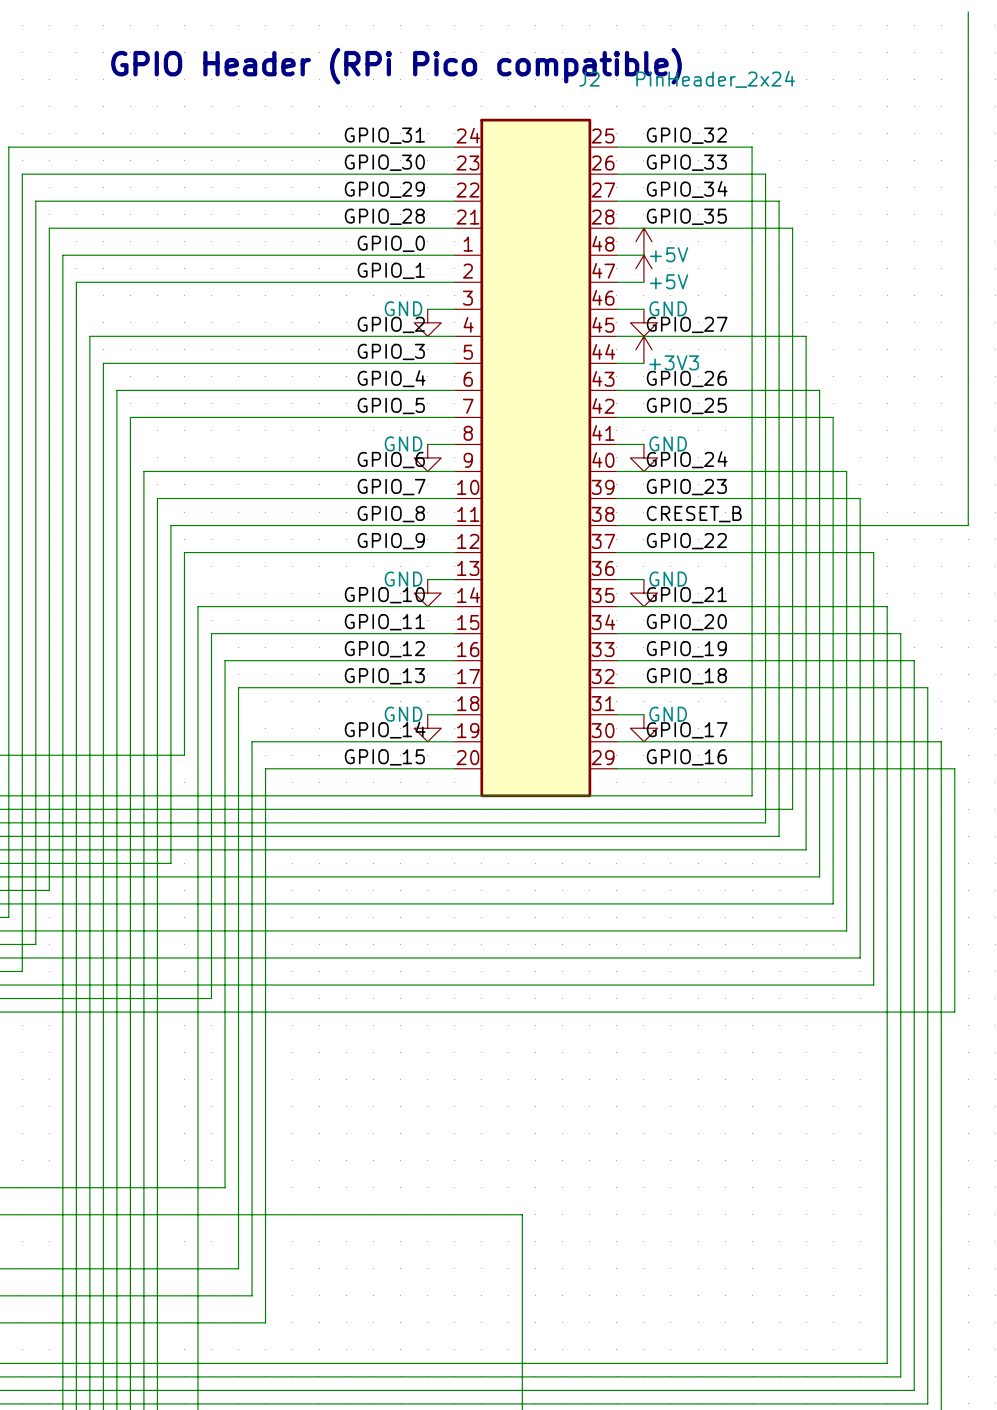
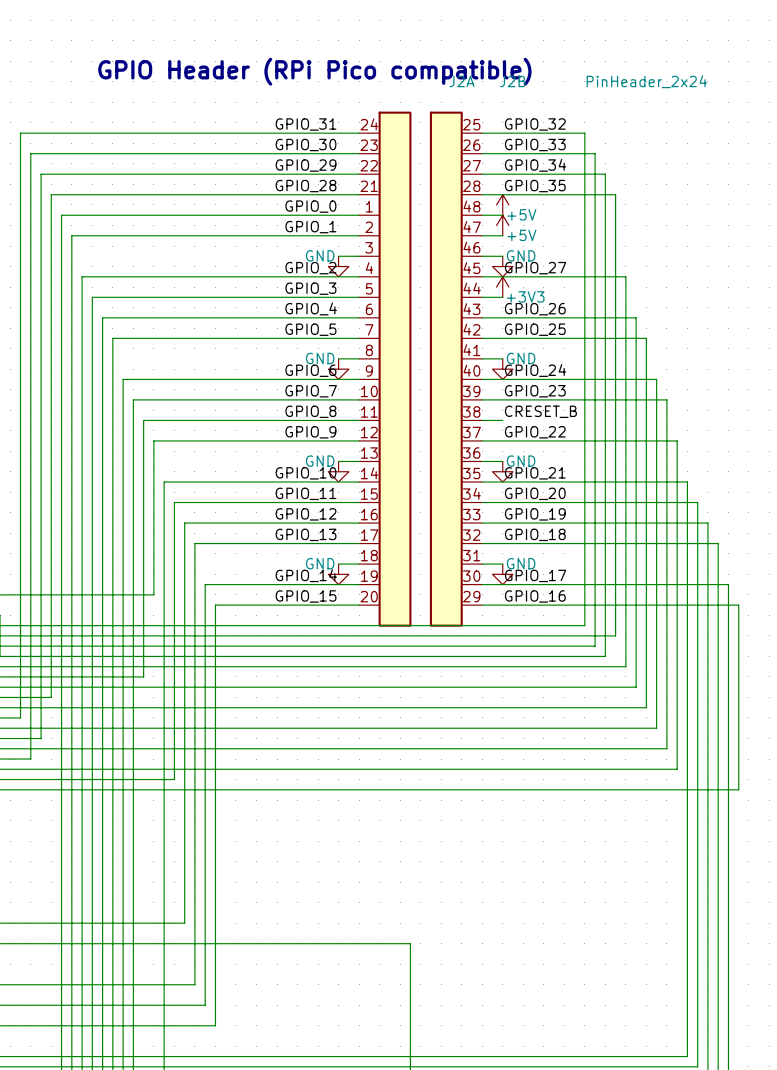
wire: (968, 11) (968, 525) (643, 525) -> none
J2A: none -> PinHeader_2x24 (385, 369)
J2: PinHeader_2x24 (535, 457) -> none
J2B: none -> (456, 369)

